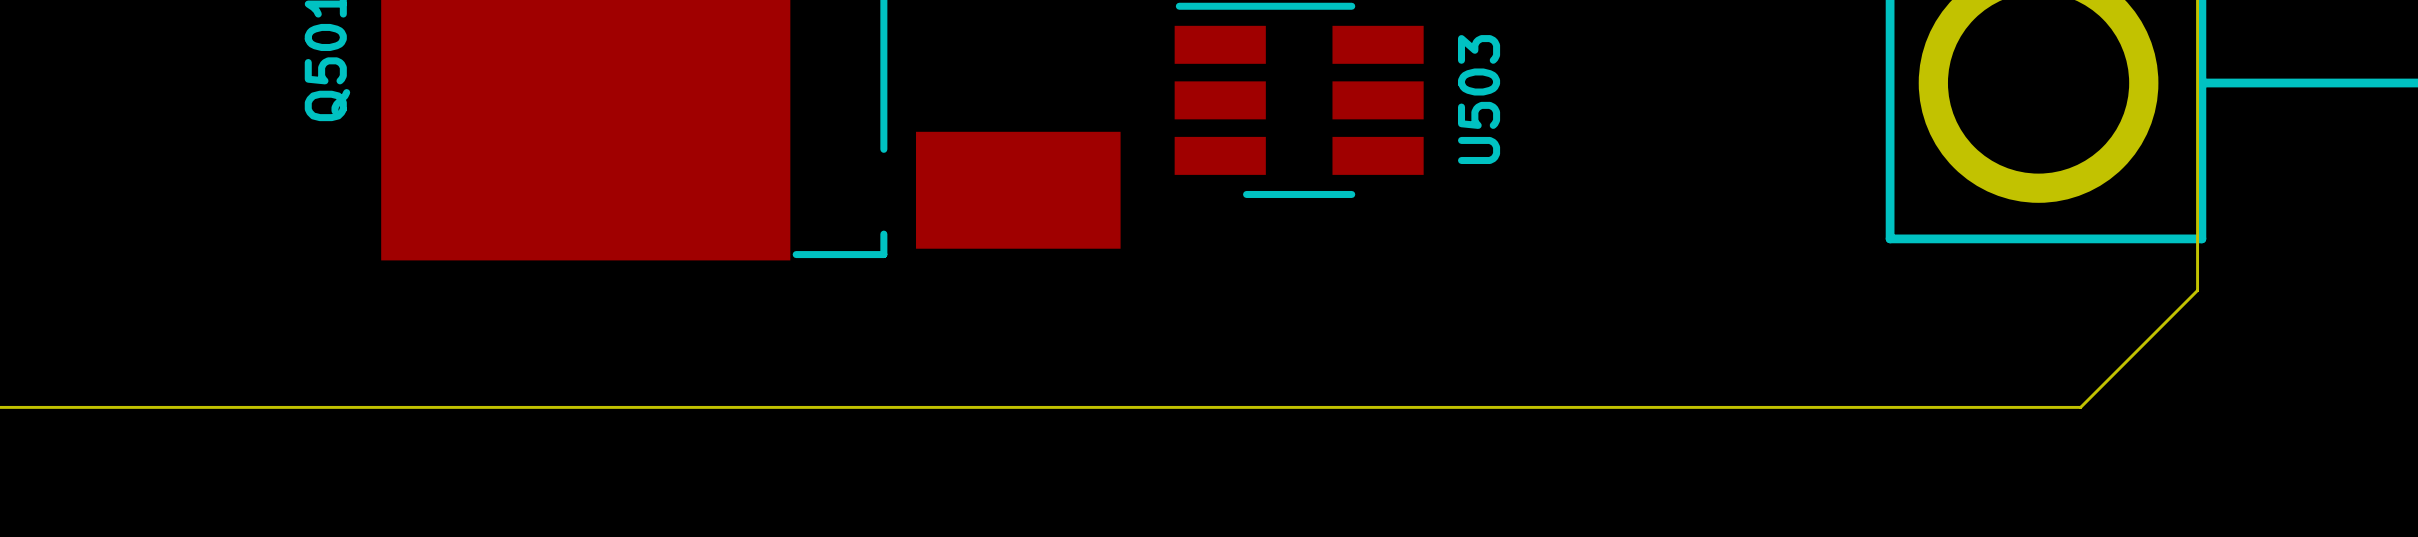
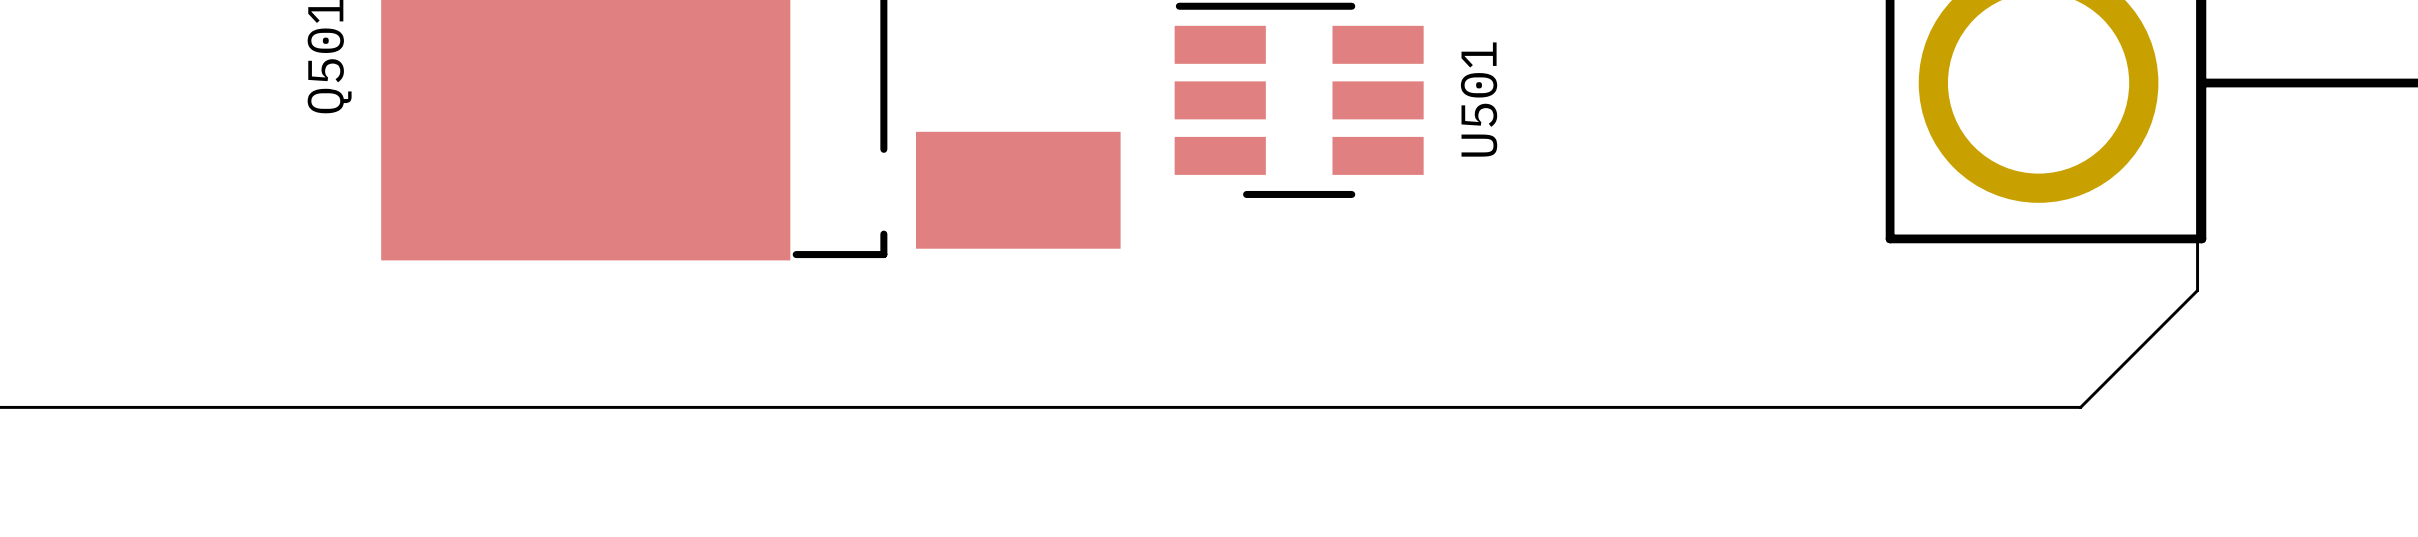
U503 name: U503 (1479, 99) -> U501 (1479, 99)

